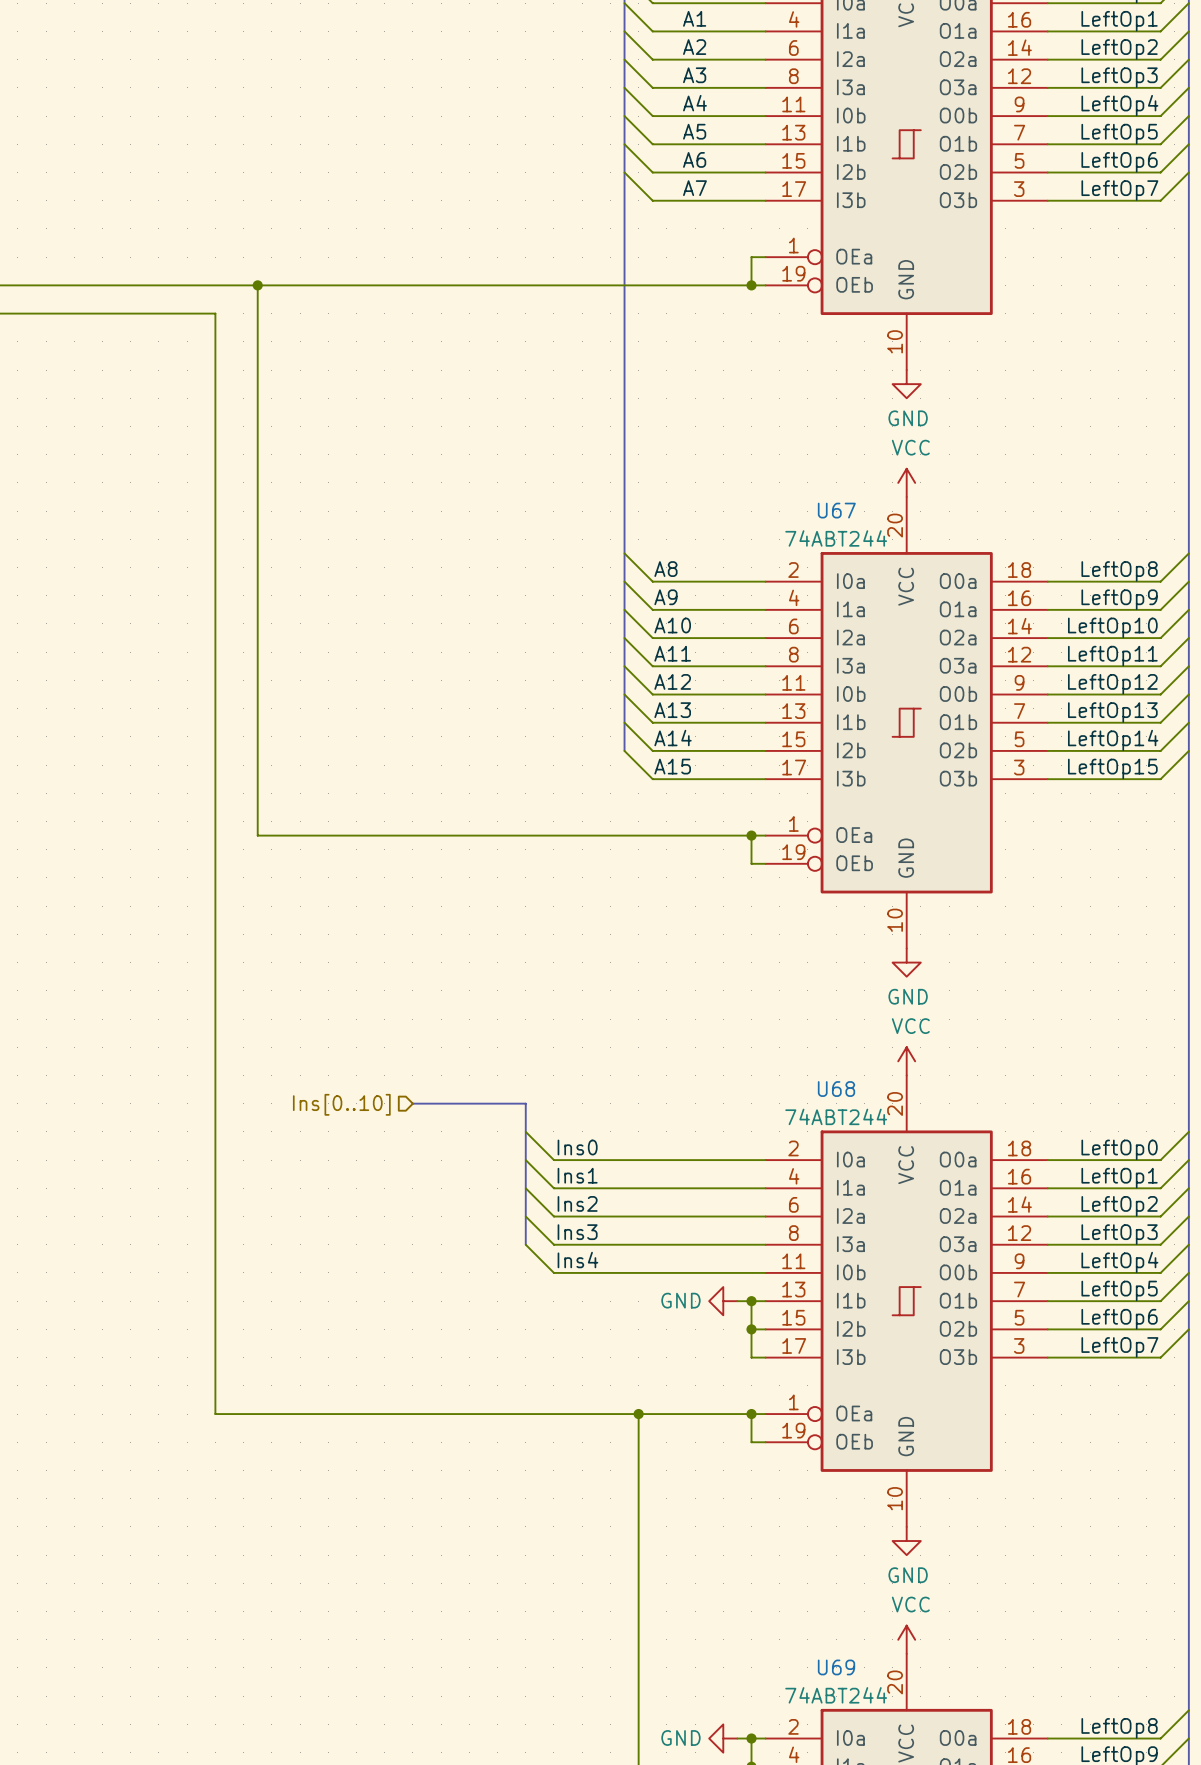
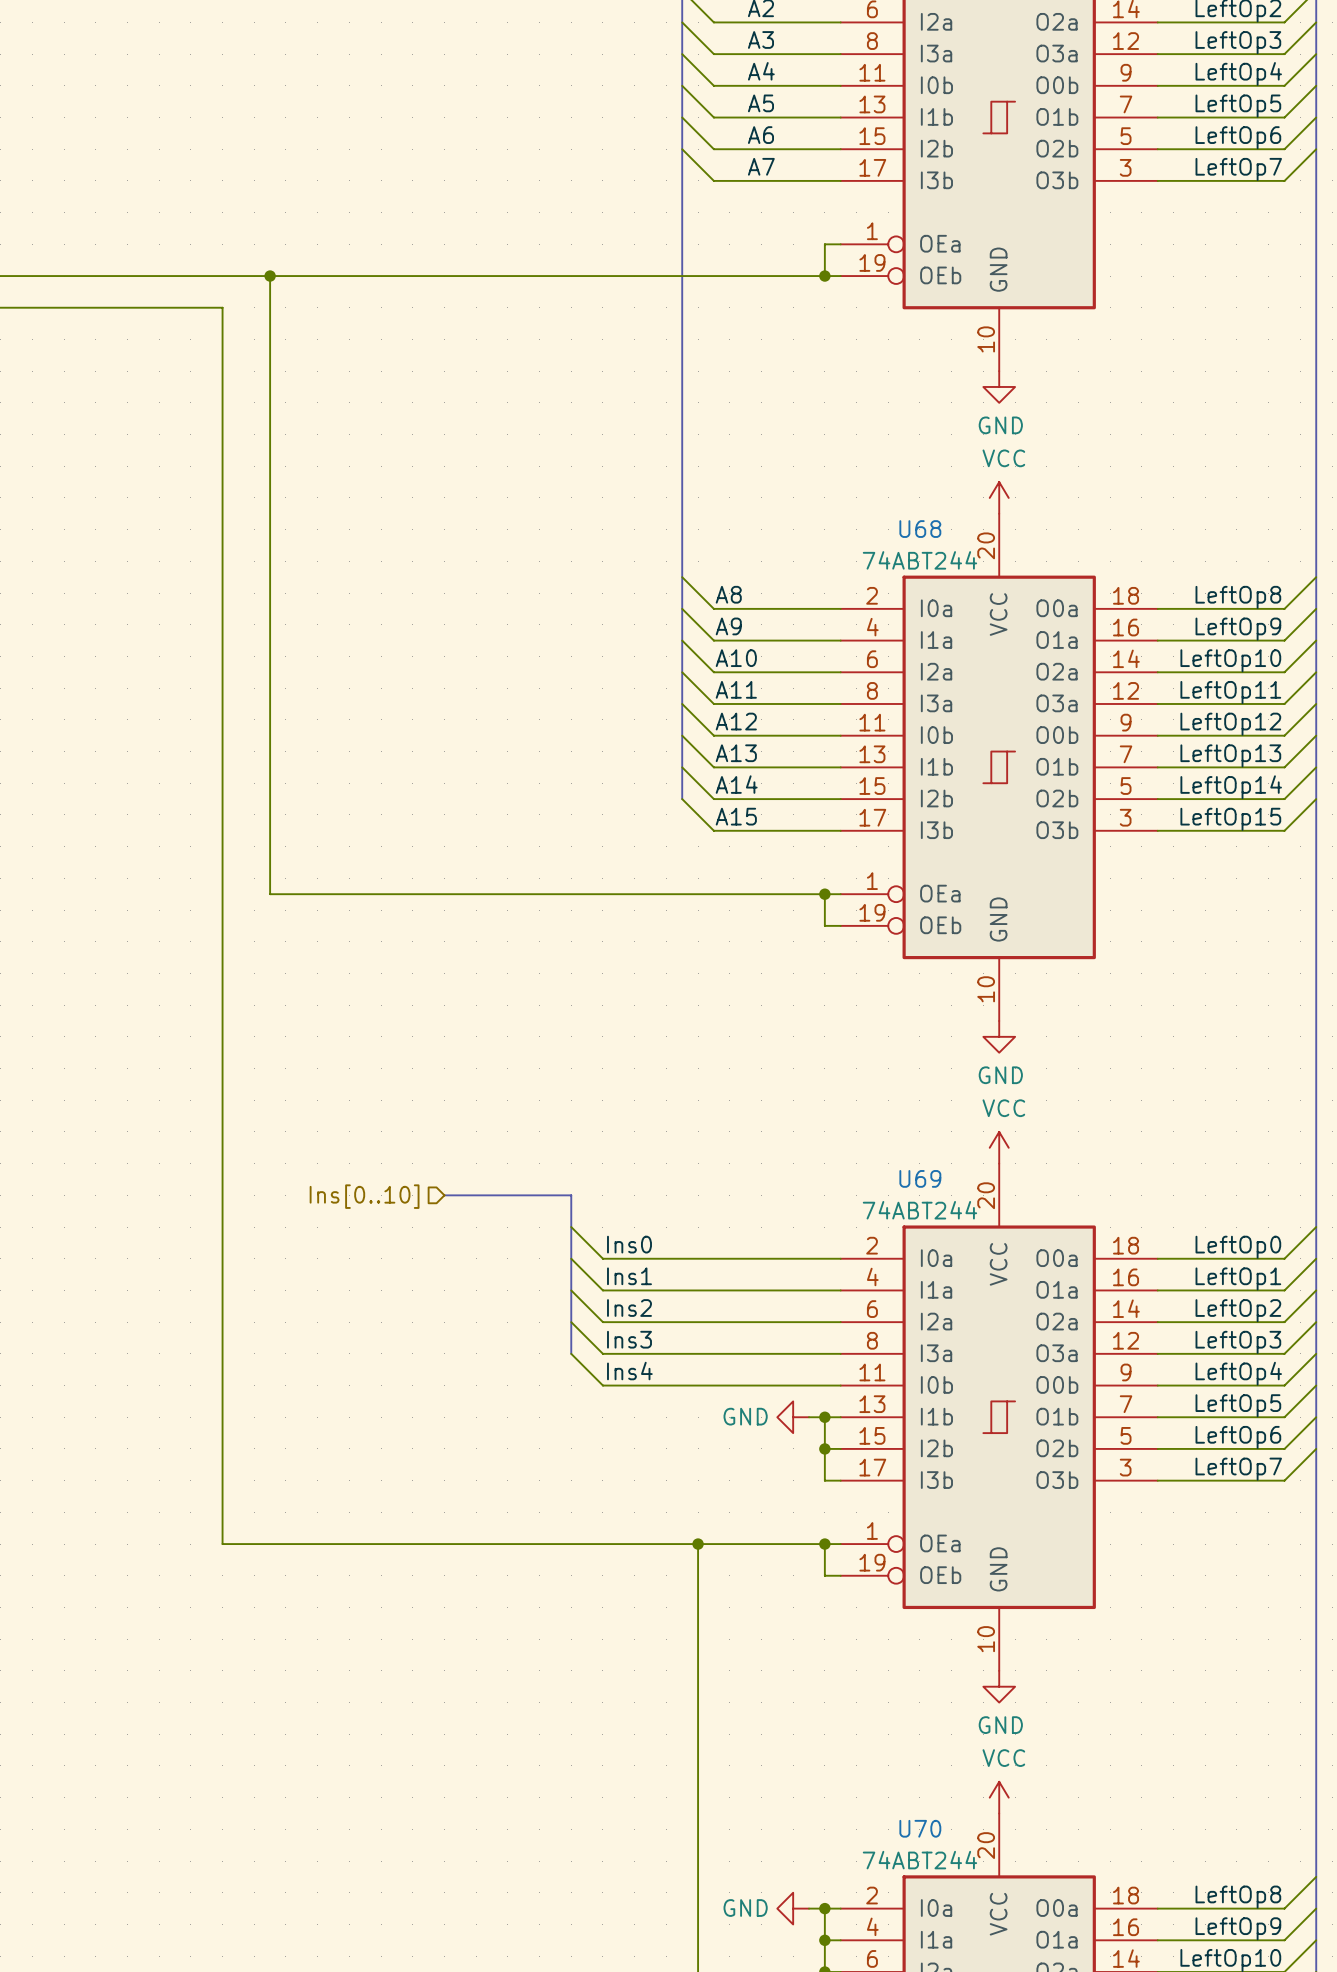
U67 name: U67 (836, 510) -> U68 (920, 529)
U68 name: U68 (836, 1089) -> U69 (920, 1178)
U69 name: U69 (836, 1667) -> U70 (920, 1828)

